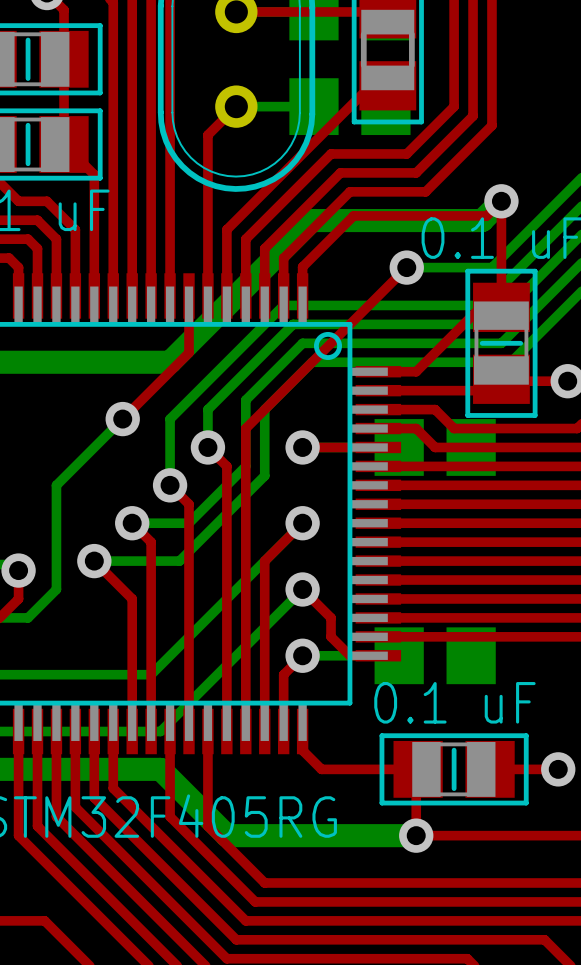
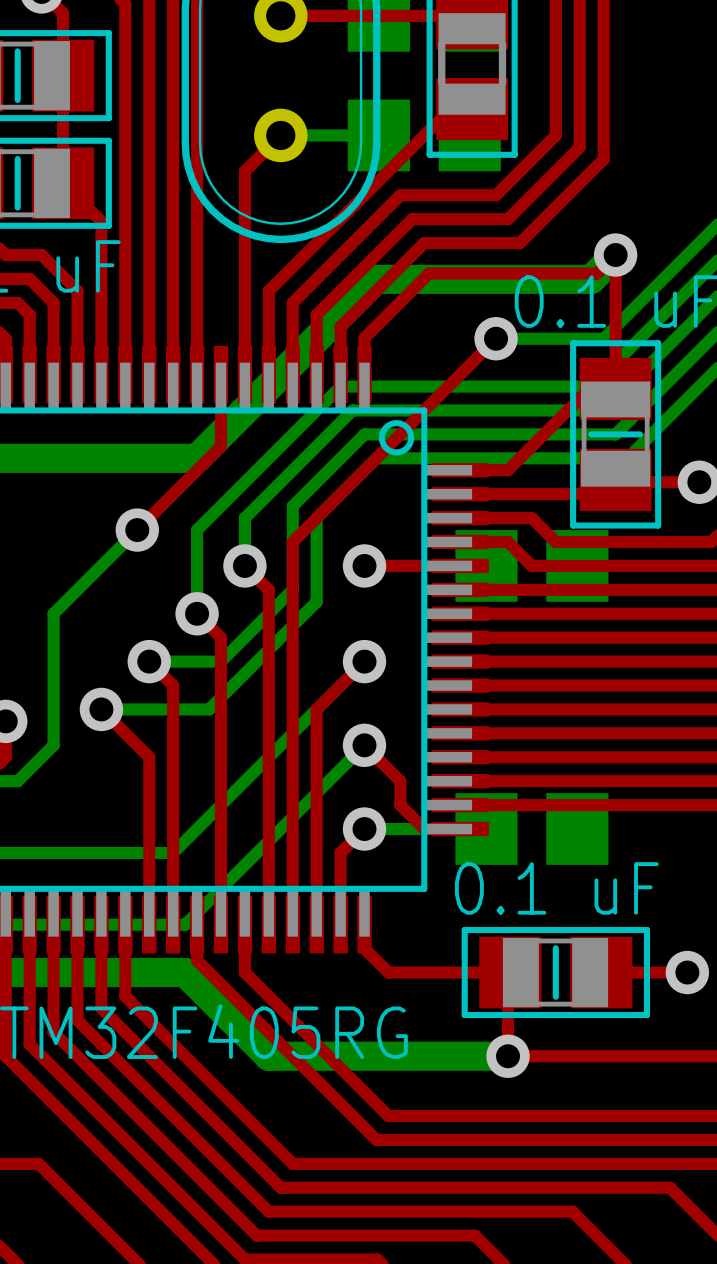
top track: (170, 759) (170, 816) (255, 901) (312, 901) -> (197, 960) (376, 1139)
top track: (207, 769) (207, 826) (264, 882) (321, 882) -> (244, 972) (388, 1116)

